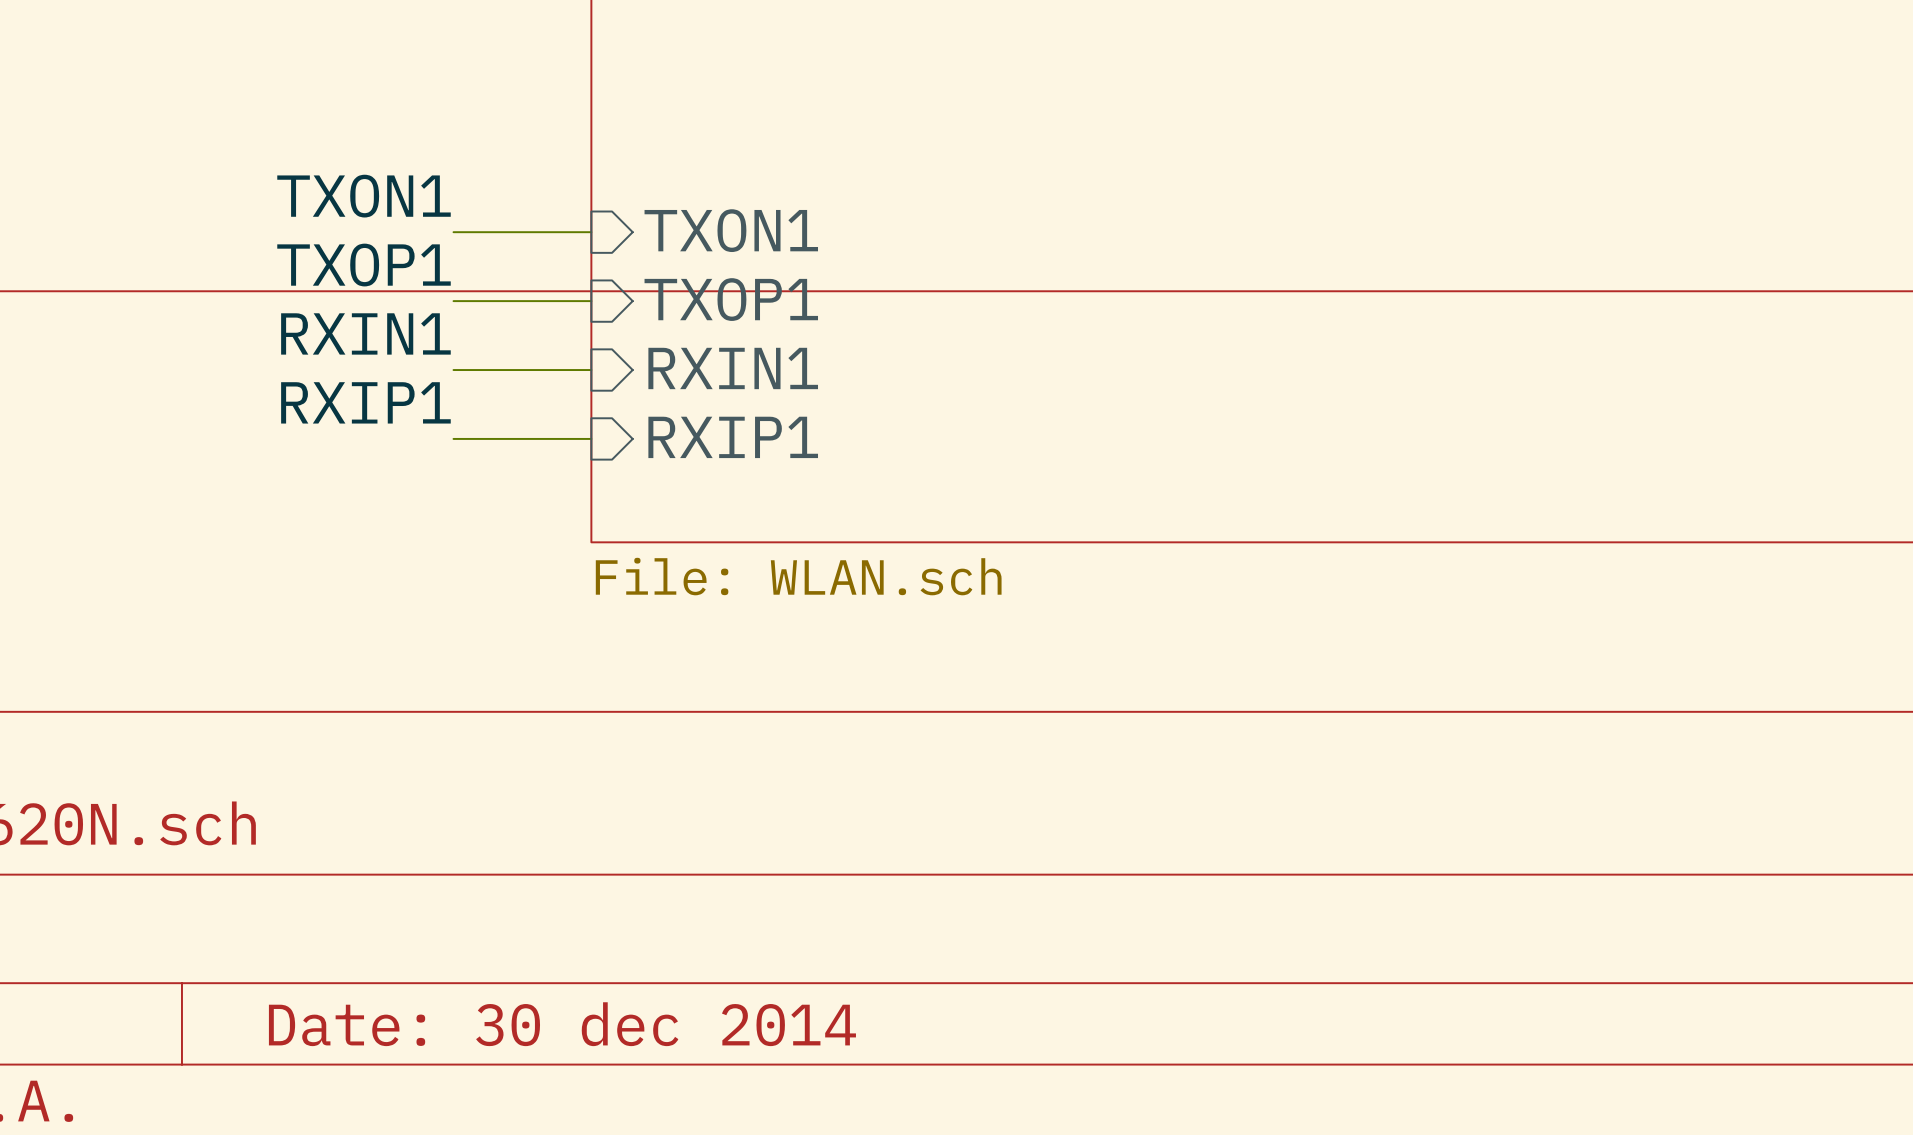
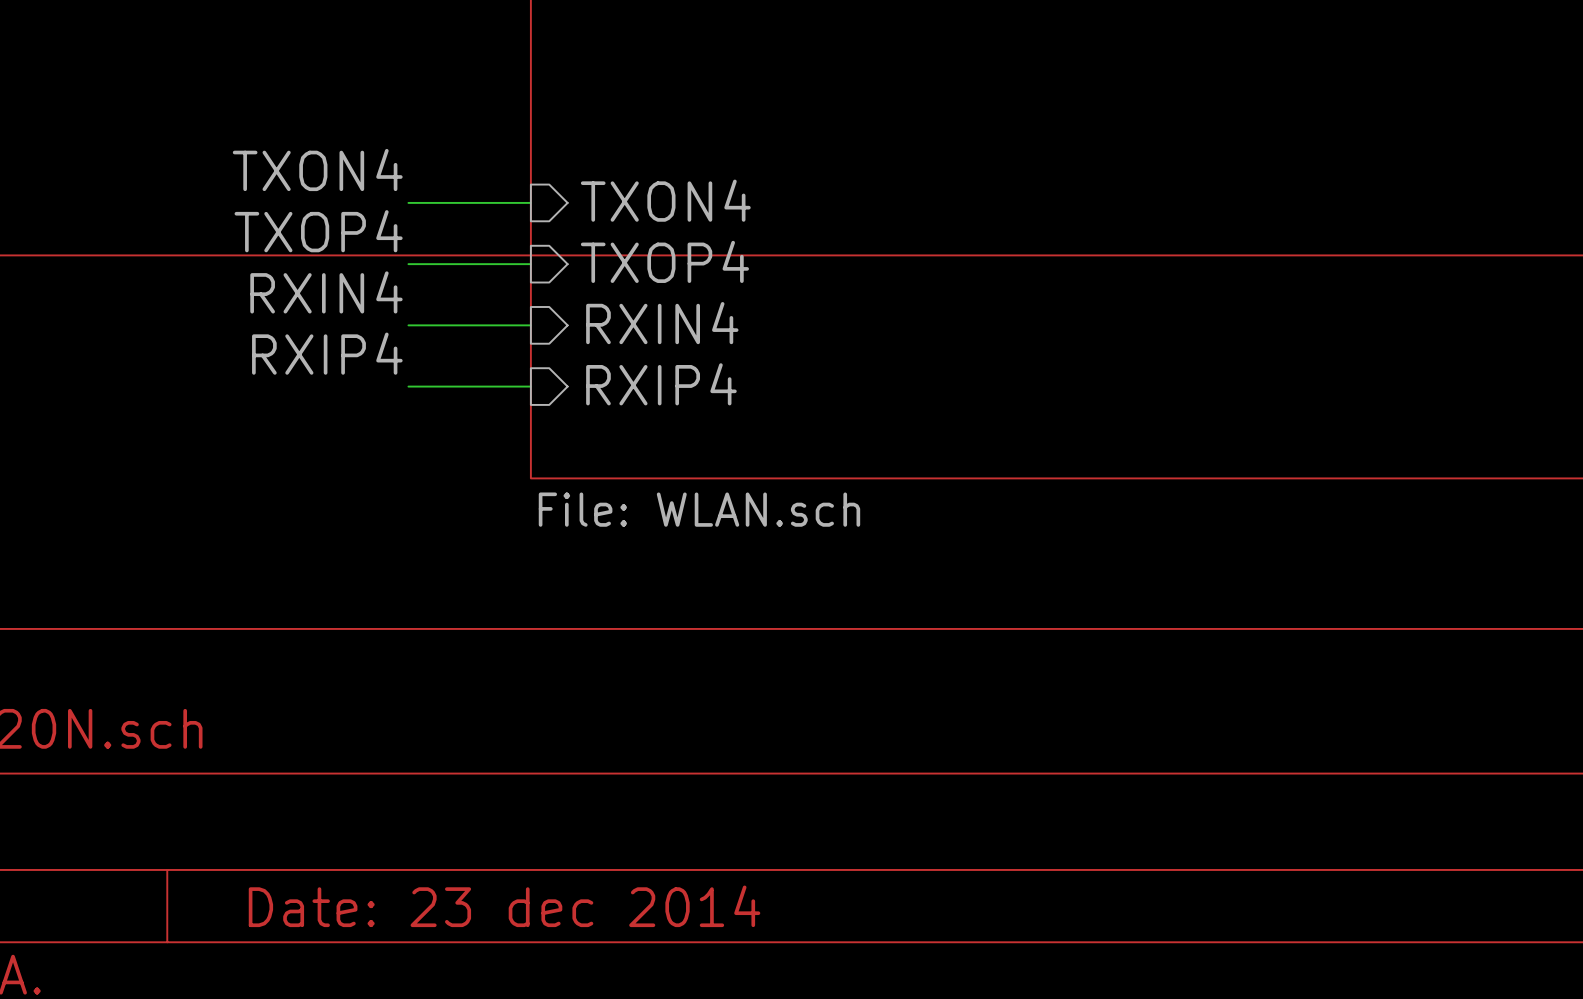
label: TXON1 (364, 196) -> TXON4 (317, 170)
sheet pin: TXON1 (731, 230) -> TXON4 (665, 200)
label: TXOP1 (364, 265) -> TXOP4 (318, 231)
sheet pin: TXOP1 (731, 299) -> TXOP4 (664, 261)
label: RXIN1 (365, 333) -> RXIN4 (326, 292)
sheet pin: RXIN1 (733, 368) -> RXIN4 (662, 323)
label: RXIP1 (365, 402) -> RXIP4 (327, 353)
sheet pin: RXIP1 (733, 437) -> RXIP4 (661, 384)
title block: Date: 30 dec 2014 (562, 1024) -> Date: 23 dec 2014 (504, 906)

